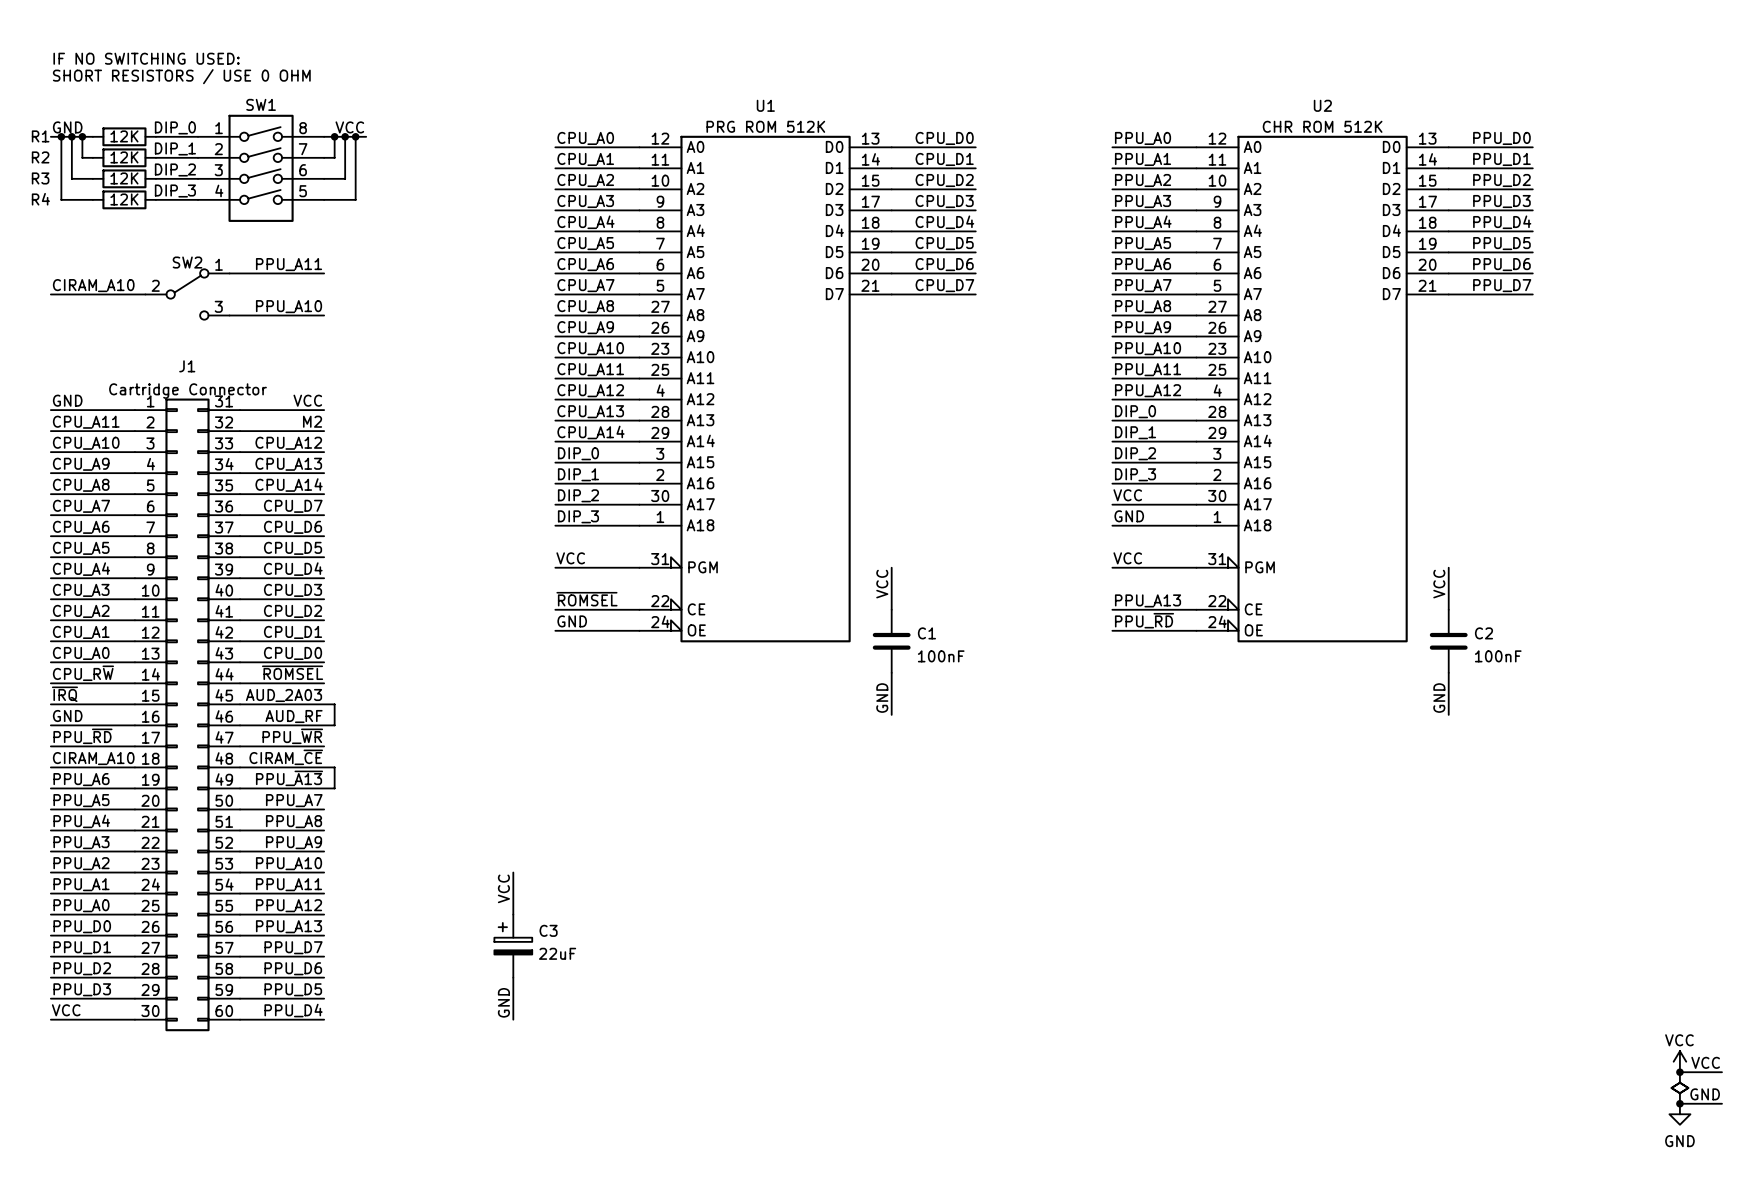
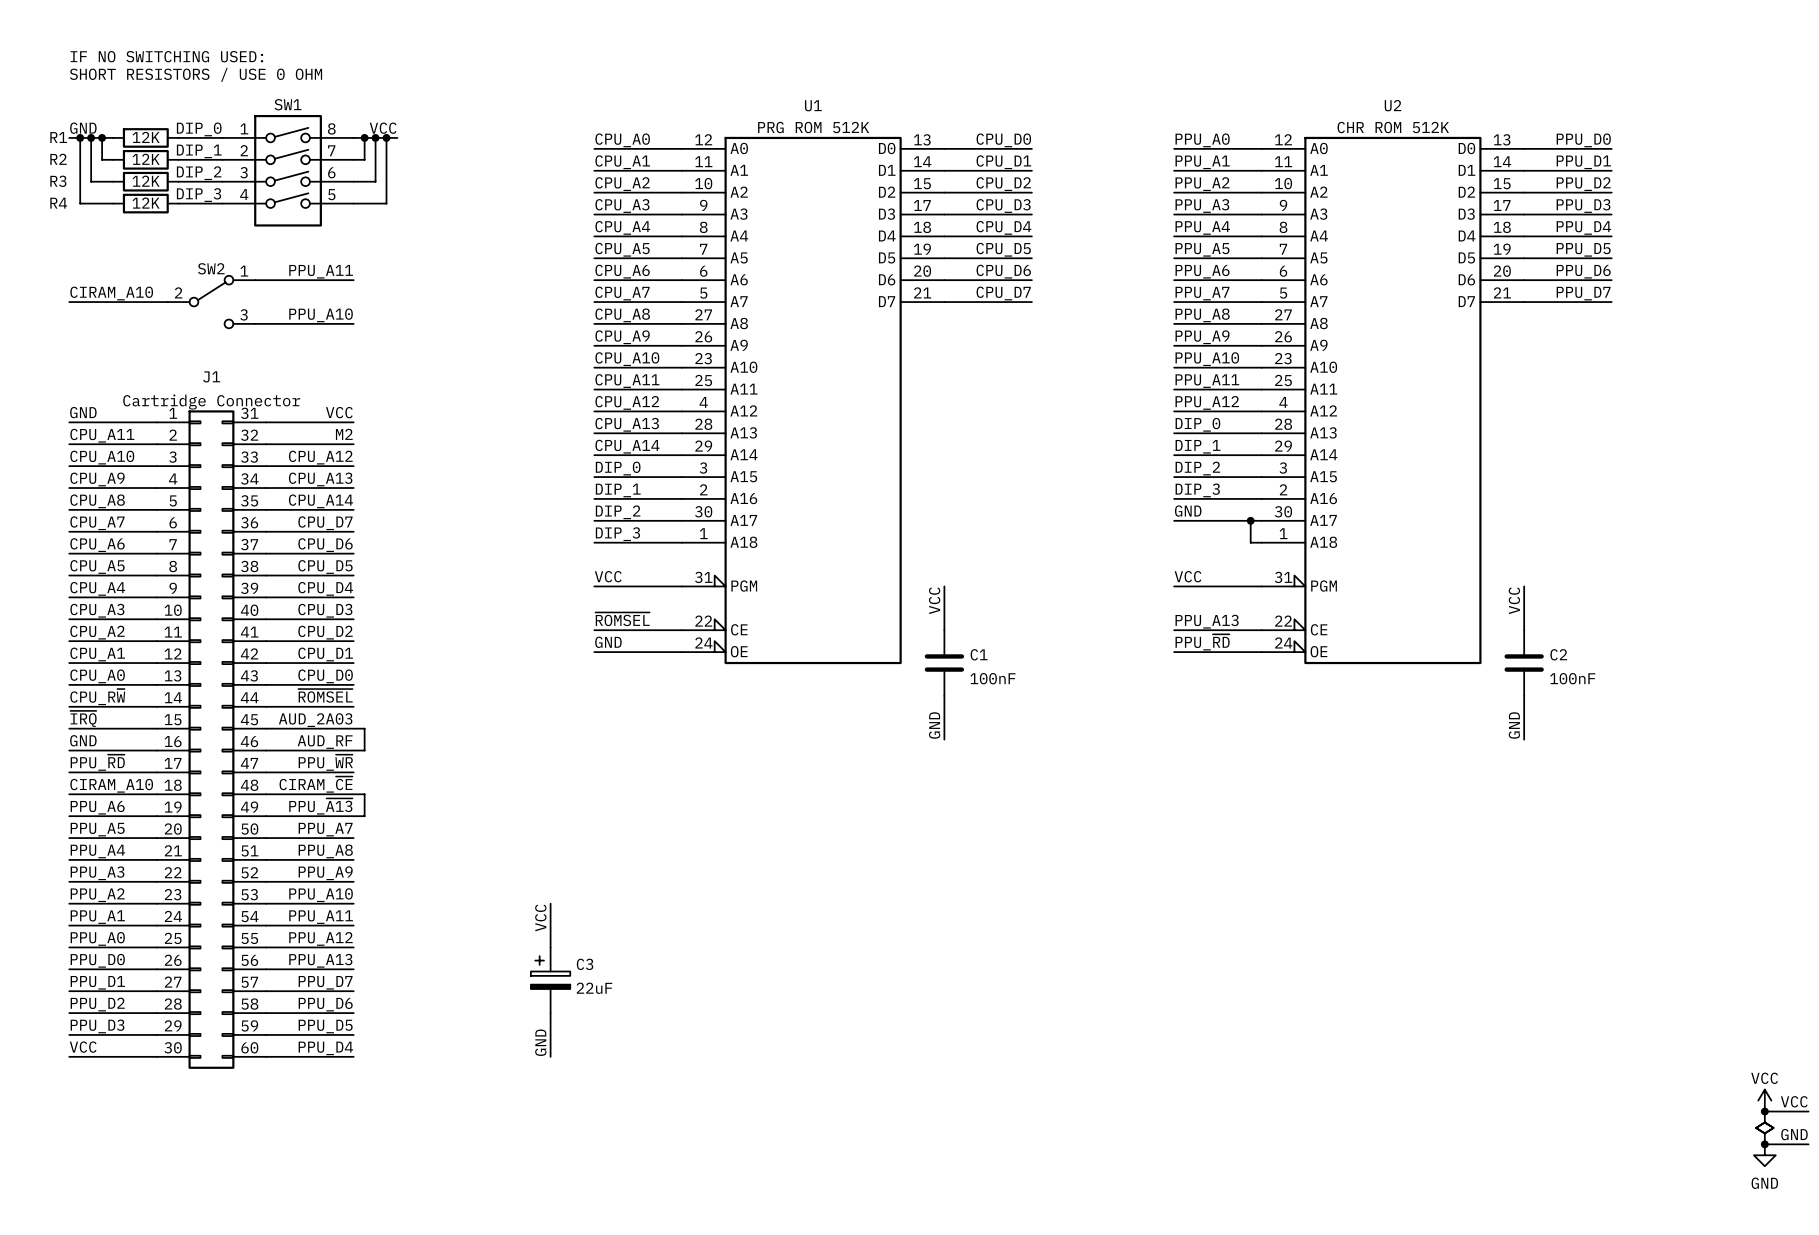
label: VCC (1127, 495) -> GND (1188, 511)
junction: none -> (1250, 520)
label: GND (1129, 516) -> none
wire: (1112, 525) (1185, 525) -> (1250, 520) (1250, 542)

